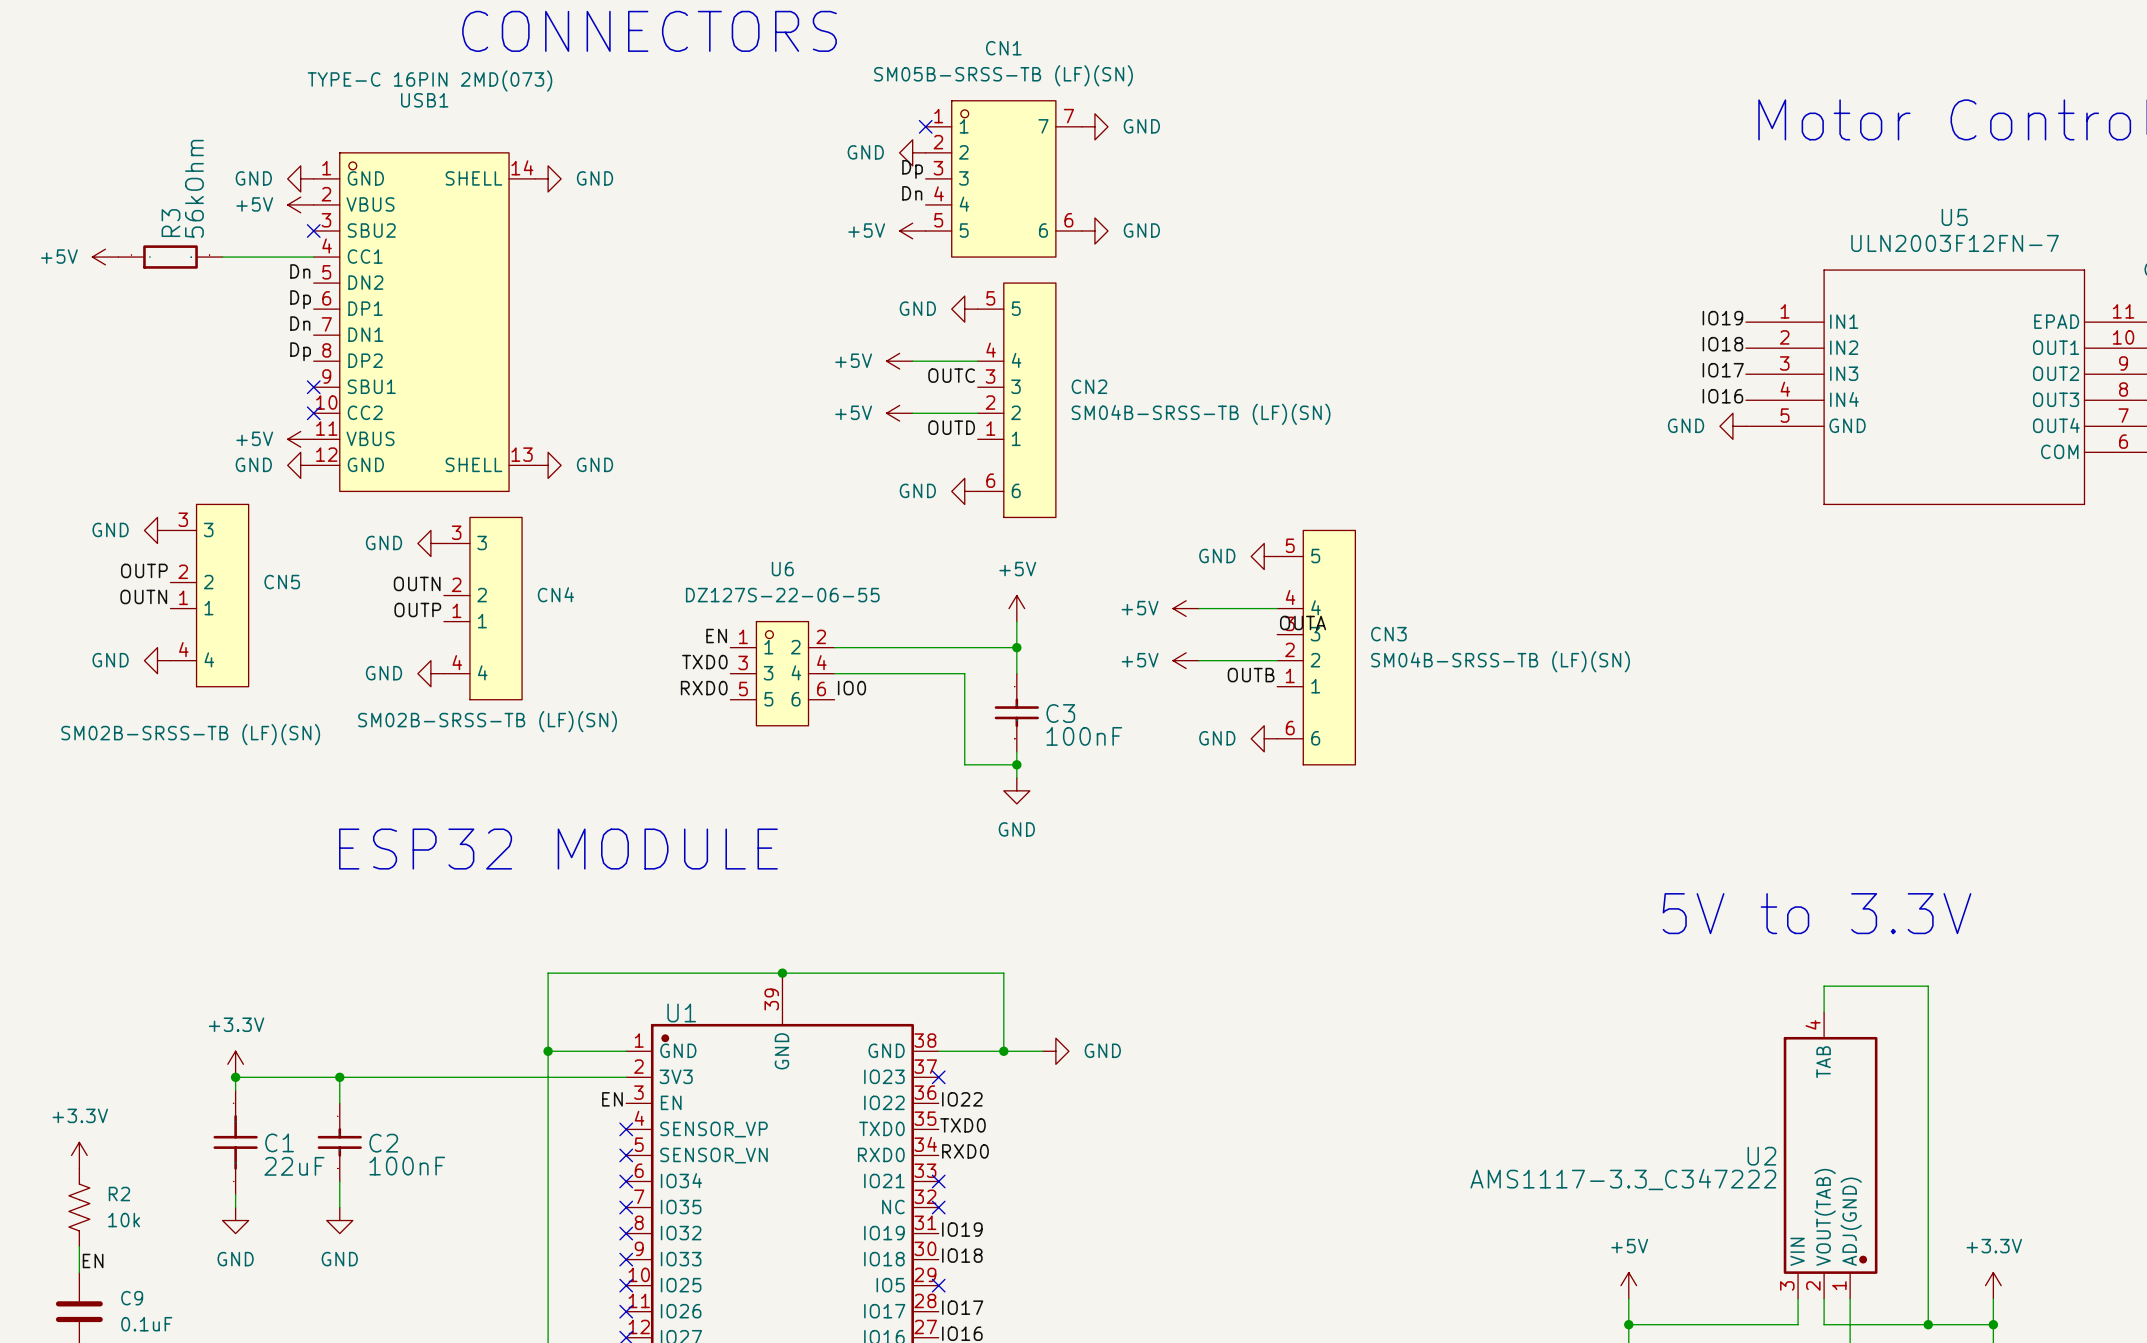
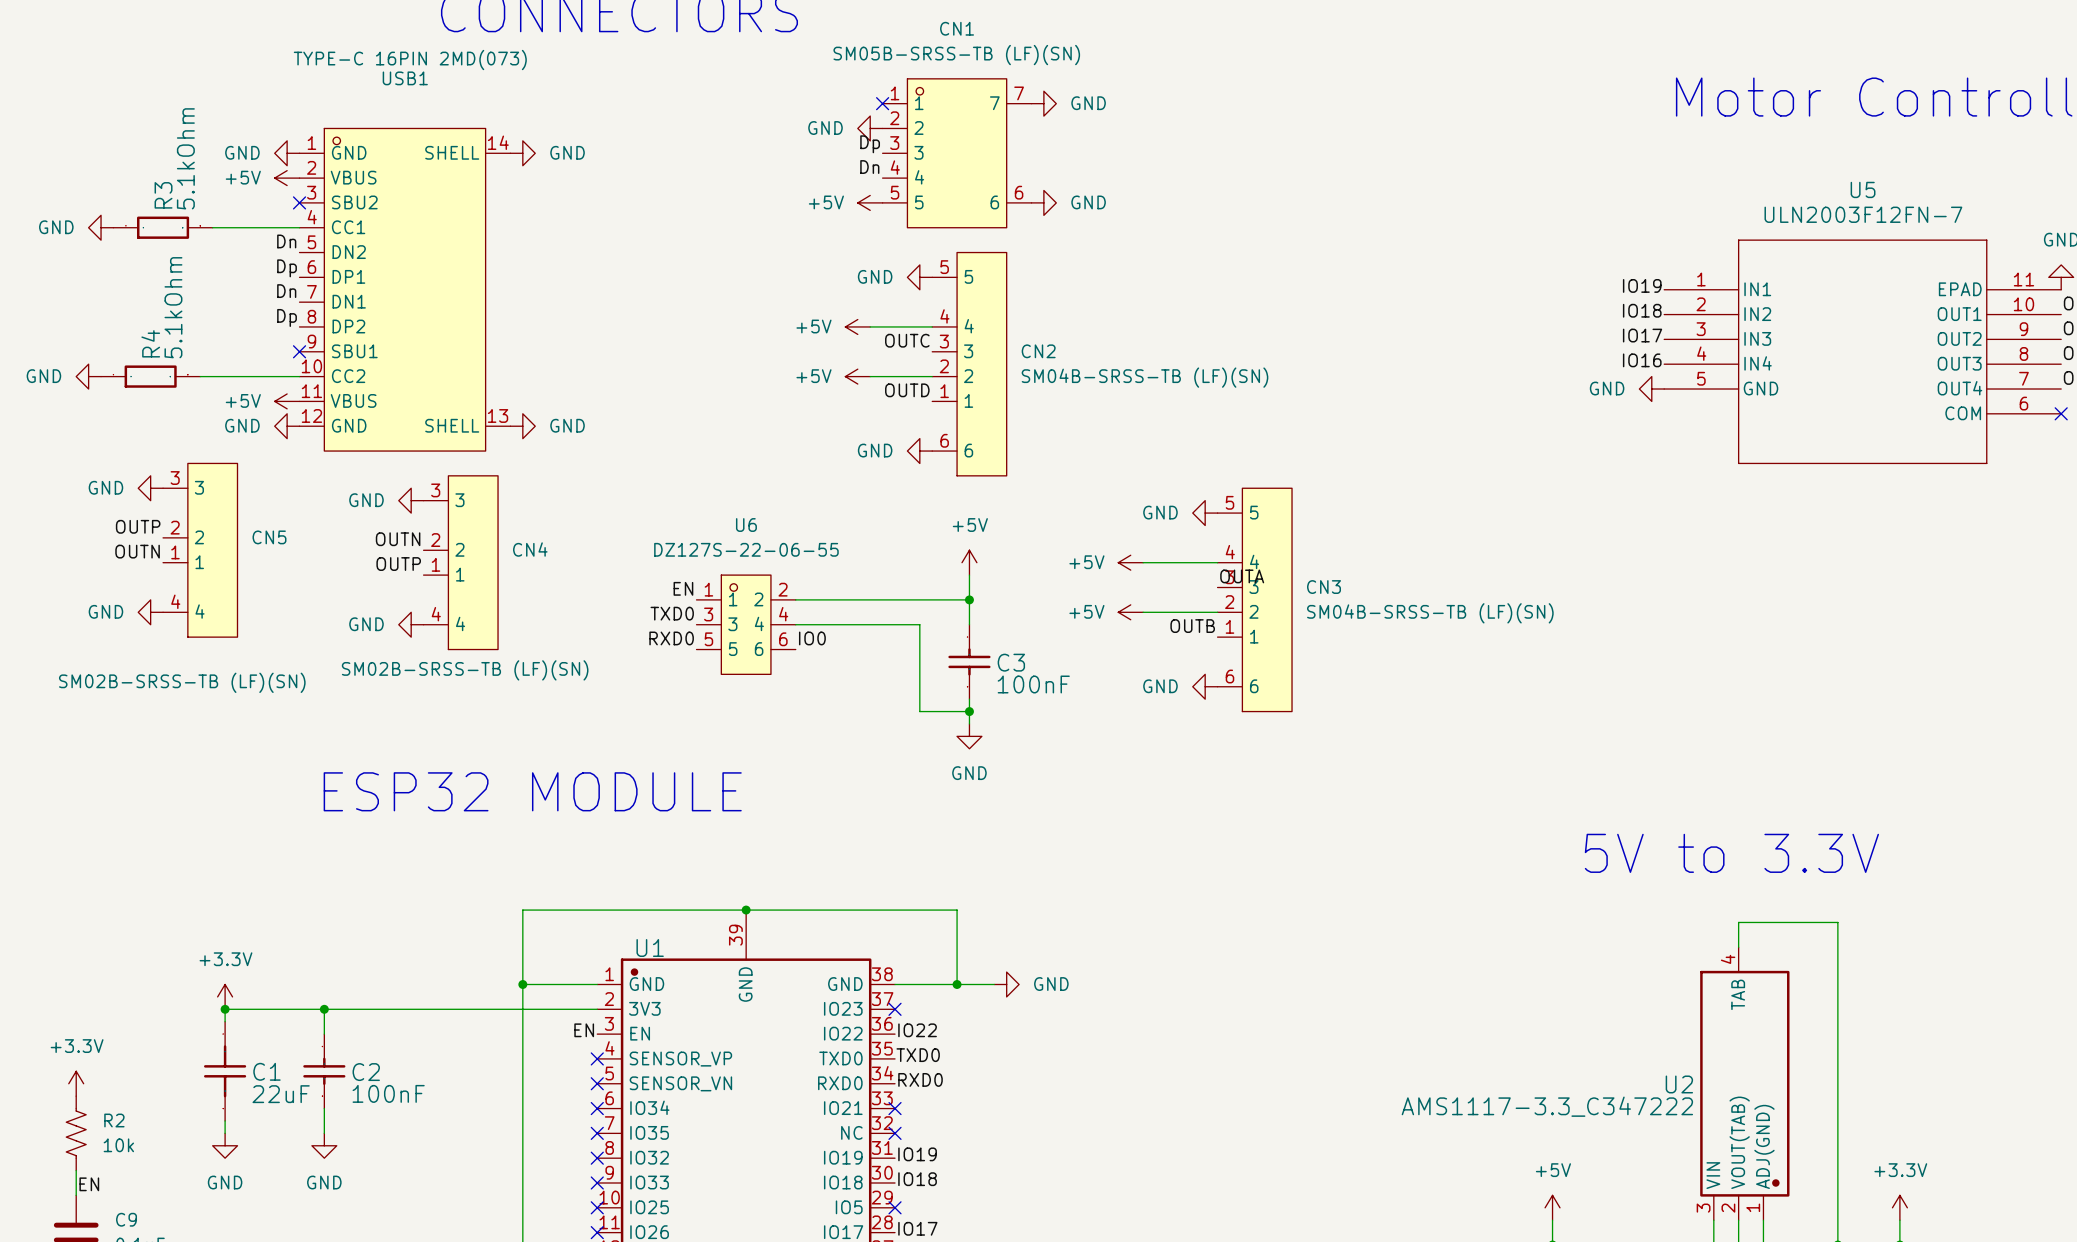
R3 value: 56kOhm (194, 188) -> 5.1kOhm (185, 158)
power symbol: +5V (105, 257) -> GND (101, 227)
power symbol: none -> GND (88, 376)
R4: none -> 5.1kOhm (150, 376)
wire: none -> (200, 376) (299, 376)
no-connect mark: (313, 413) -> none

